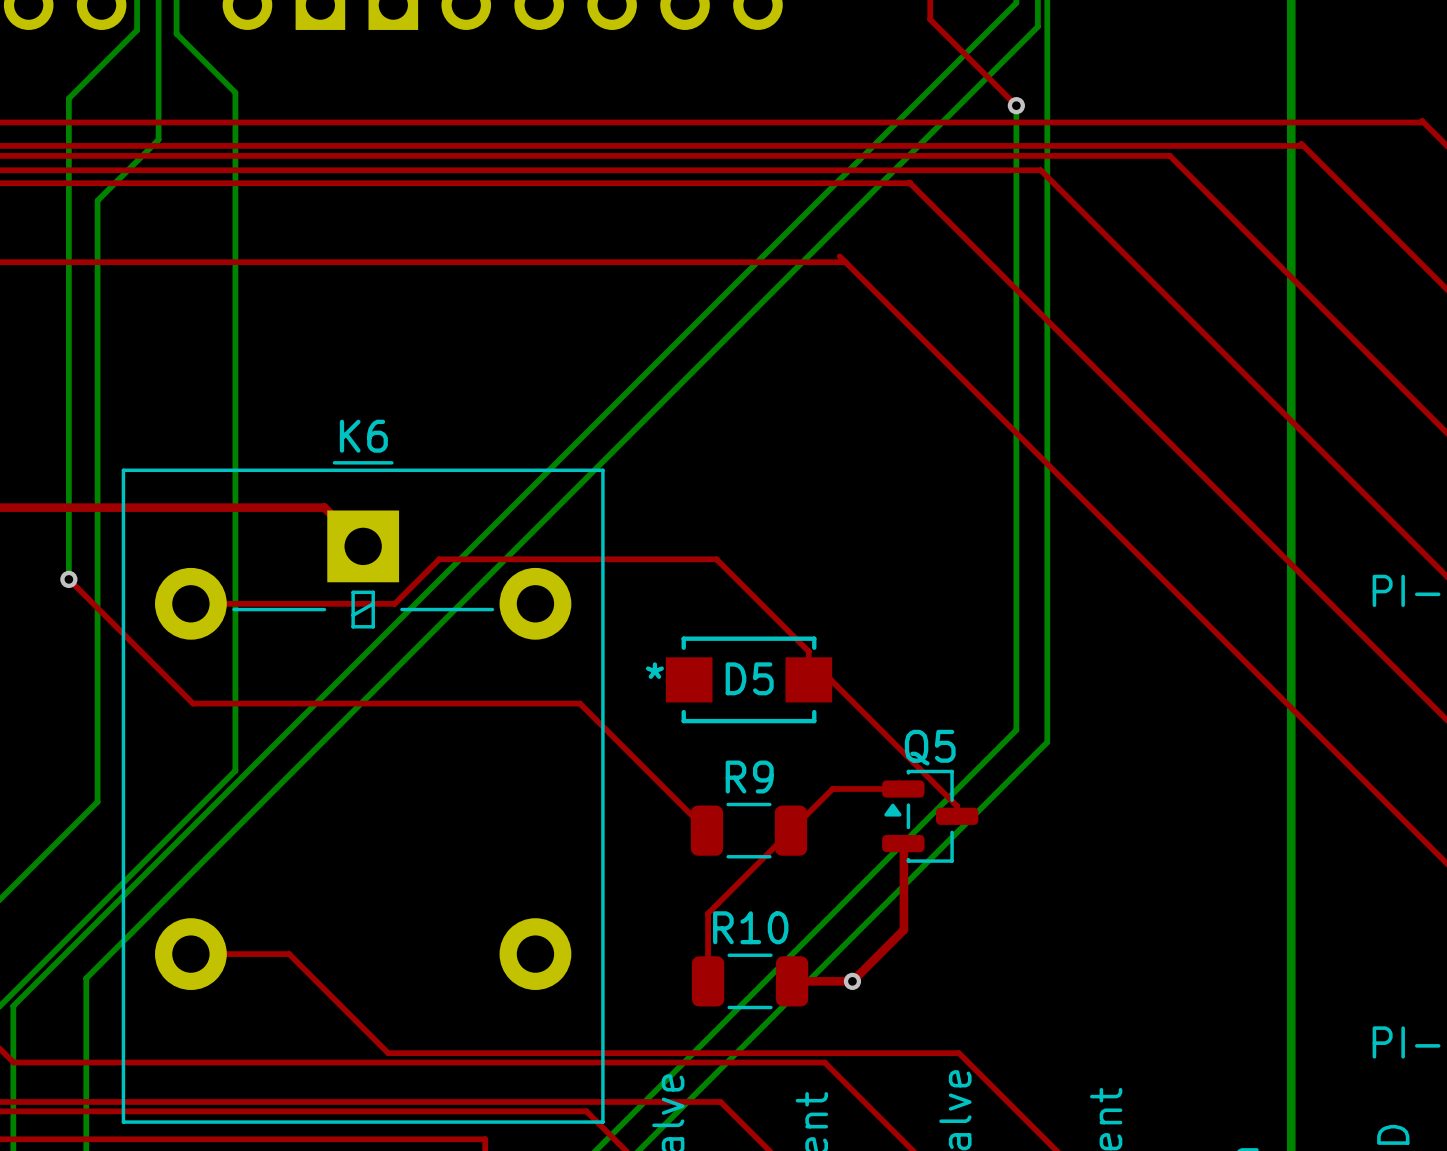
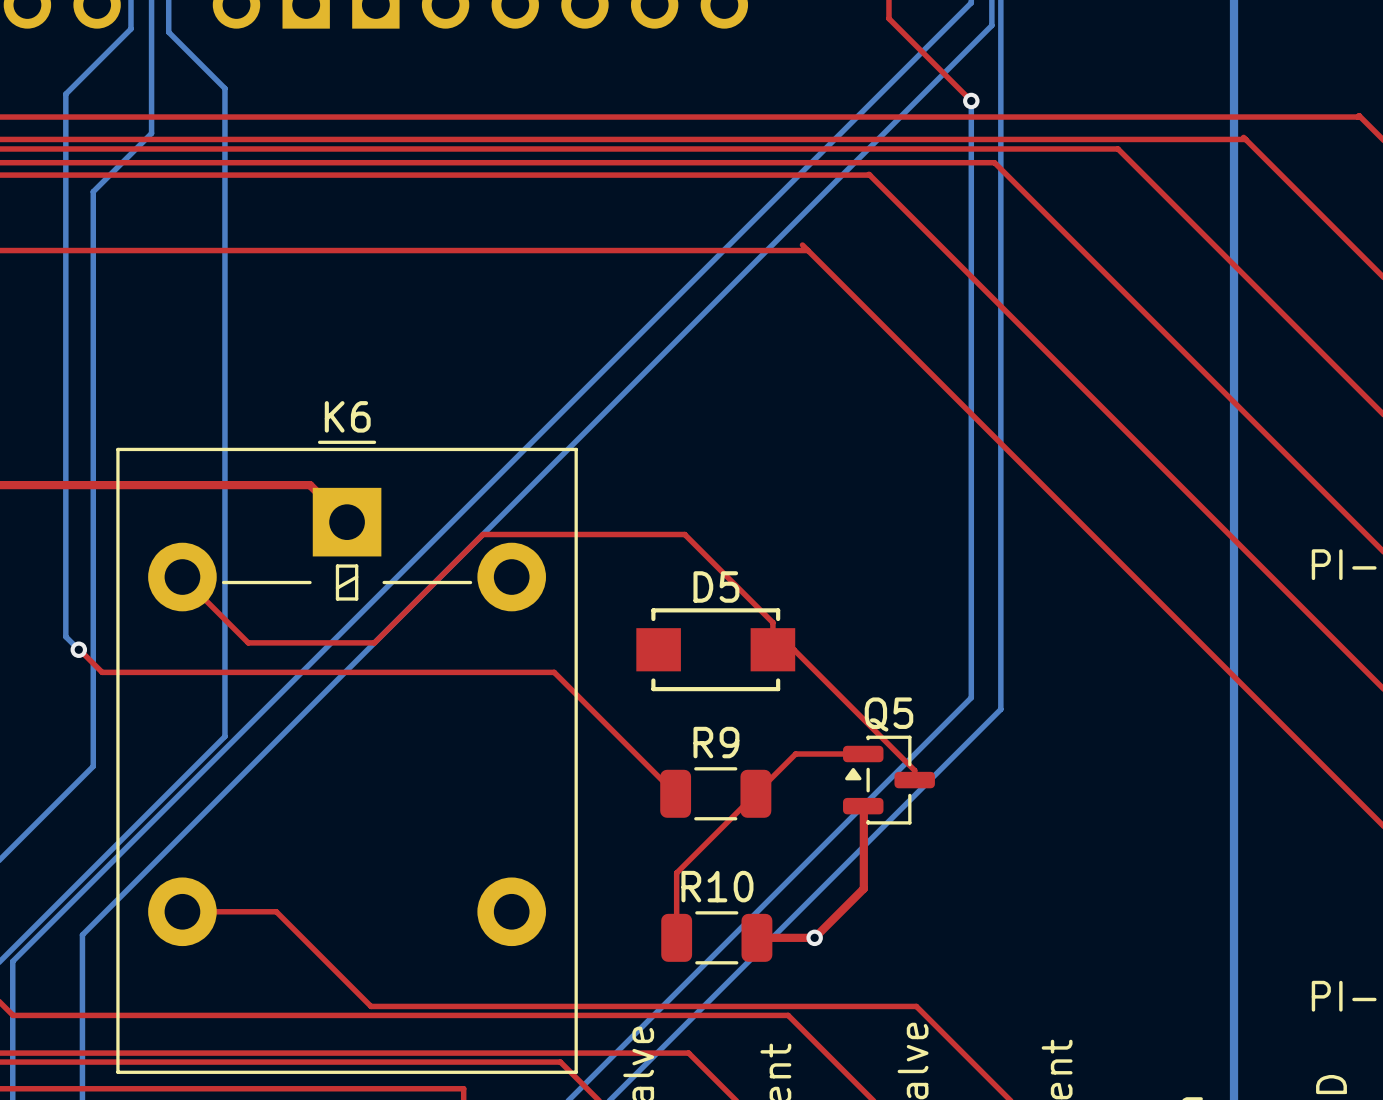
top track: (505, 559) (439, 559) (394, 603) (190, 603) -> (482, 534) (374, 642) (248, 642) (182, 577)
top track: (68, 579) (193, 703) -> (78, 649) (102, 672) (184, 672)
bottom track: none -> (65, 553) (65, 636) (78, 649)
via position: (68, 579) -> (78, 649)
D5 text: * (654, 670) -> none
D5 name position: D5 (749, 678) -> D5 (716, 586)

